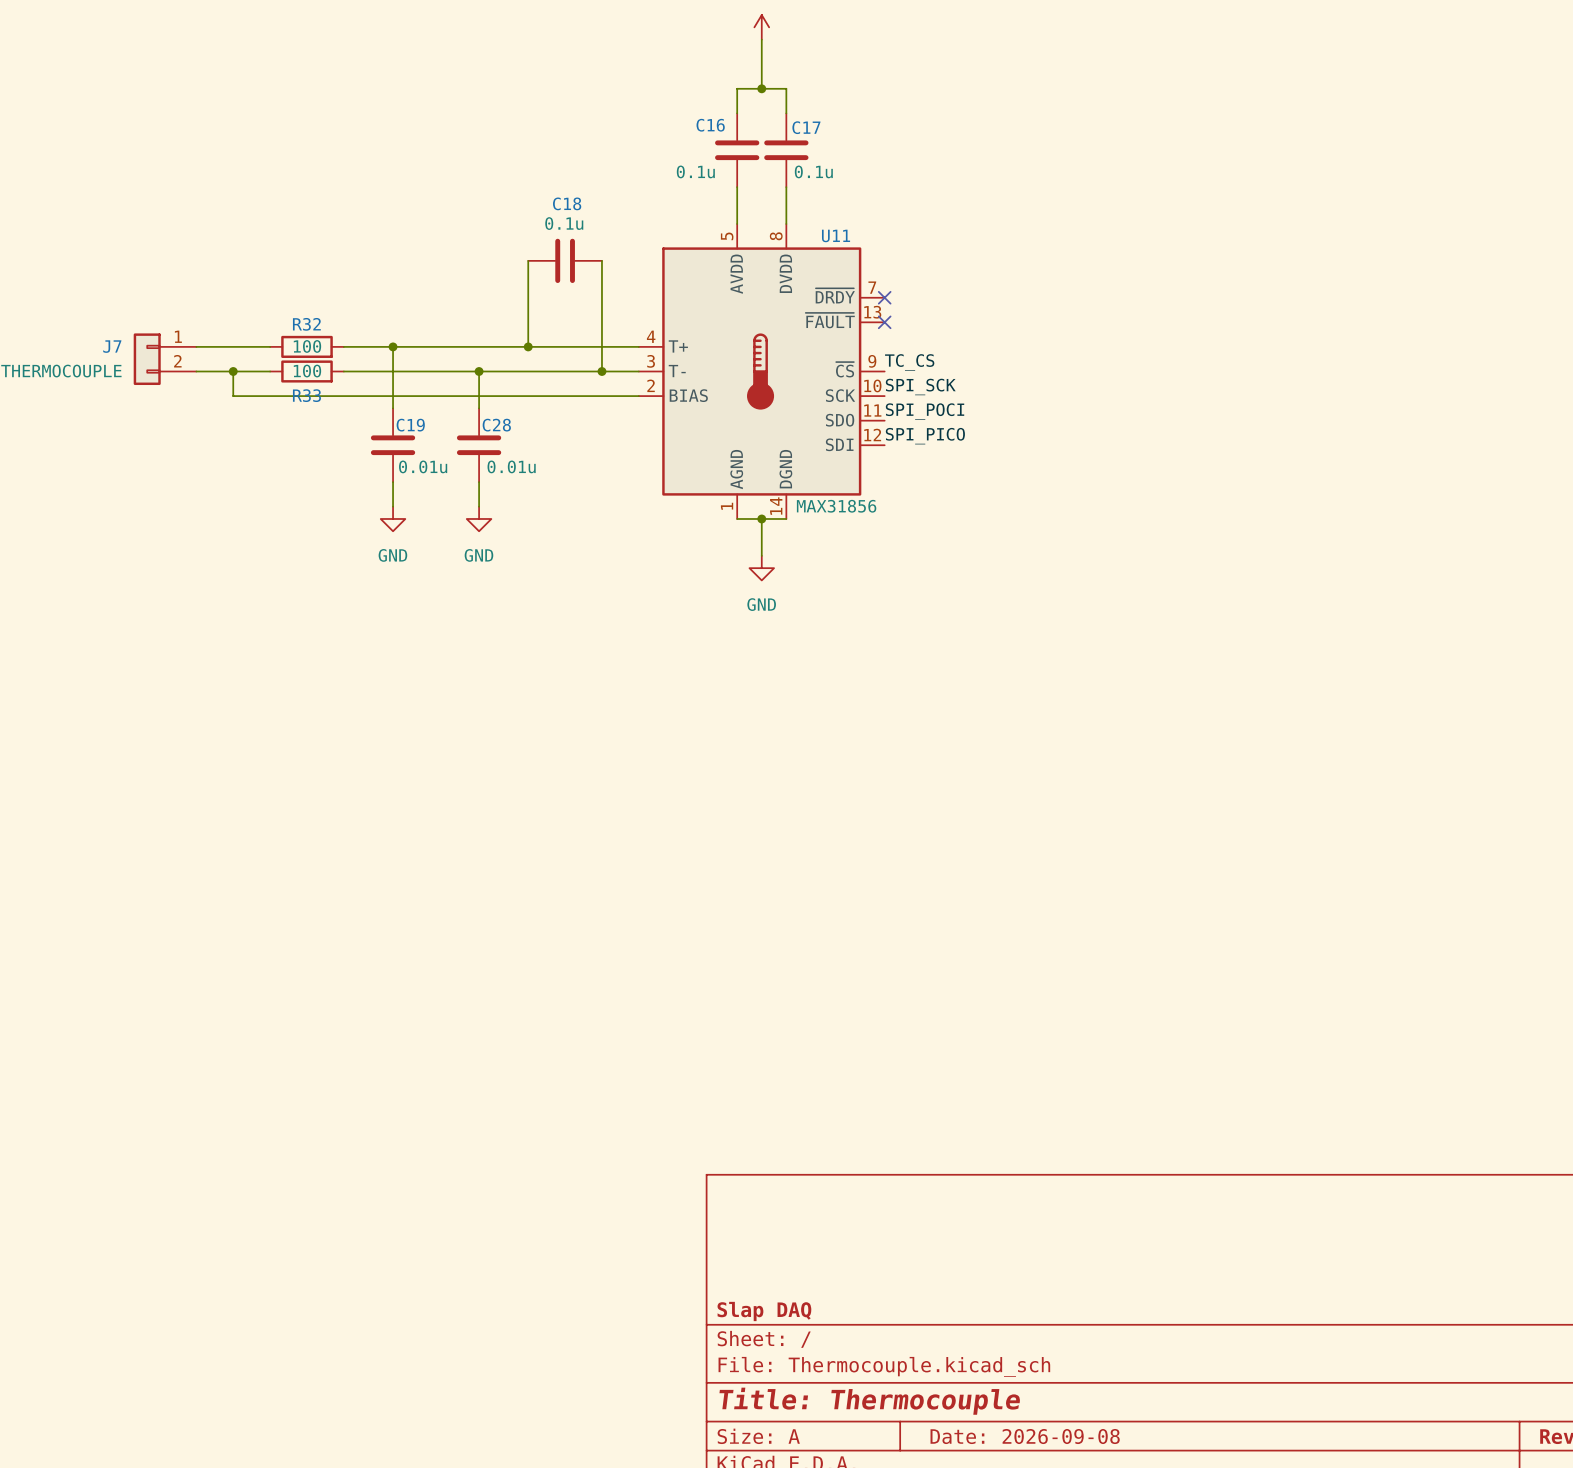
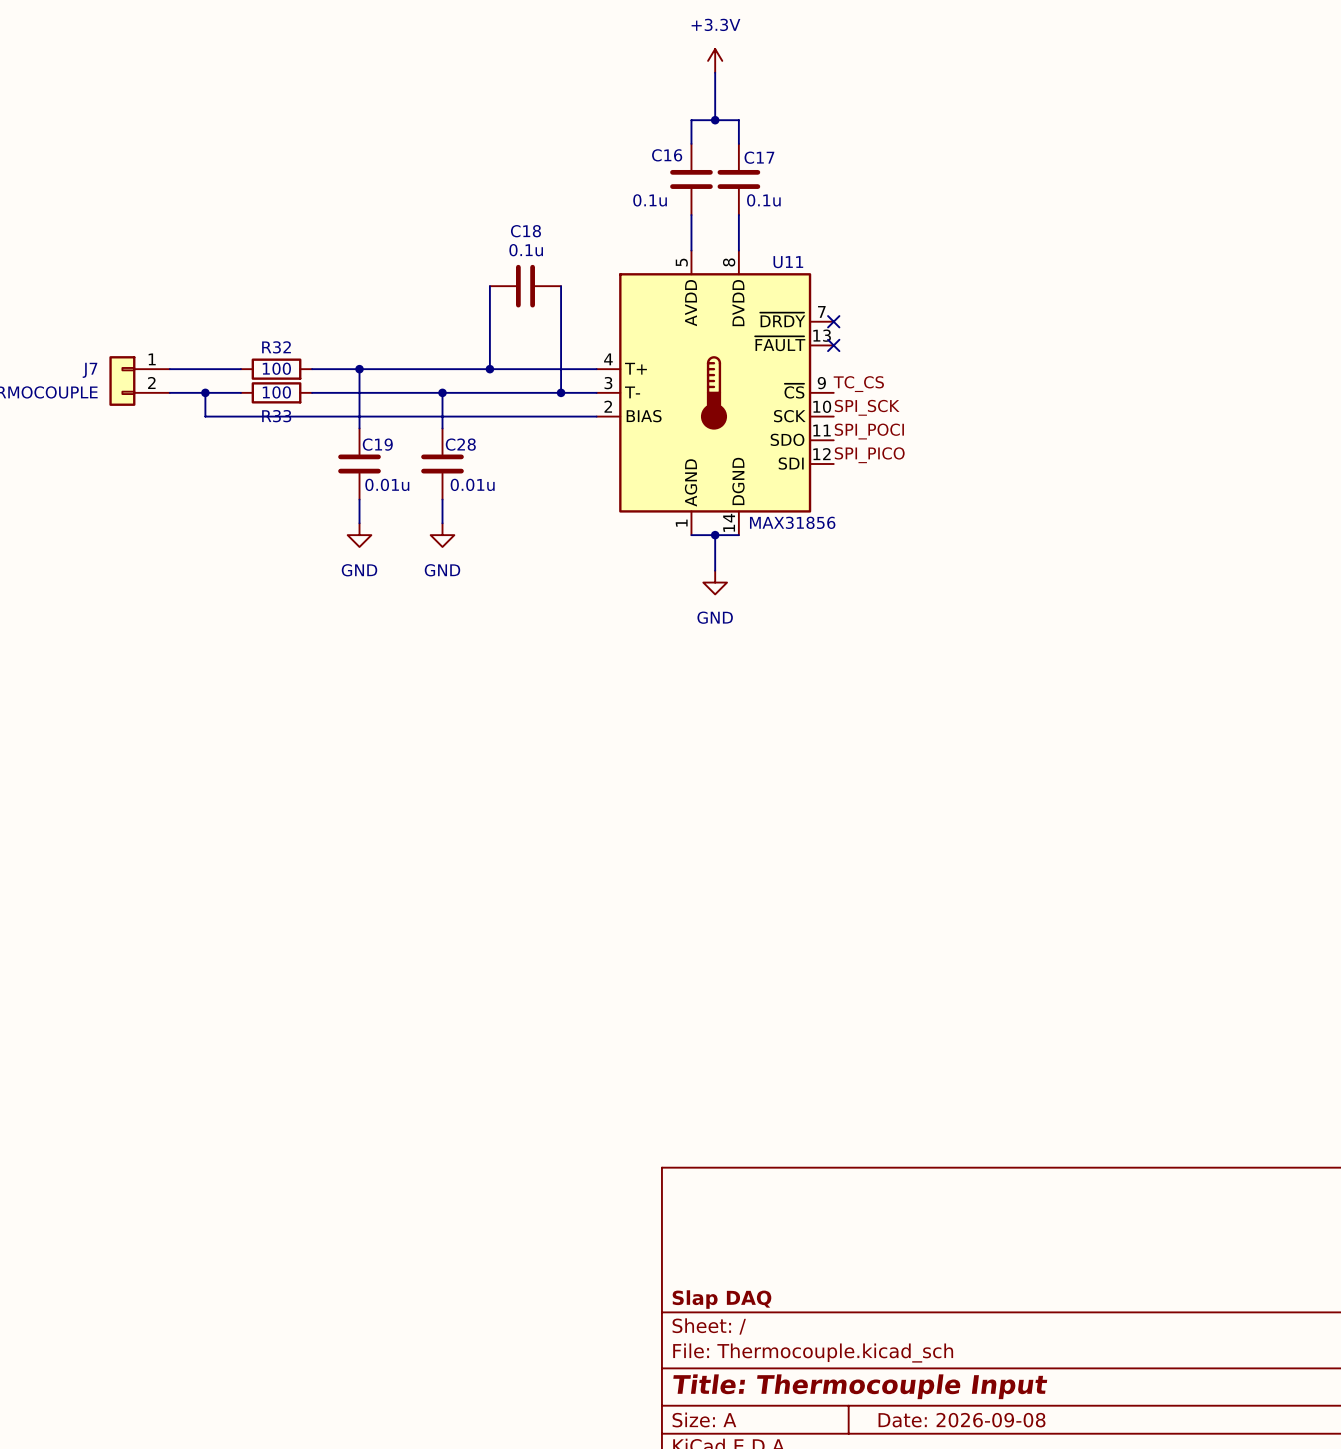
title block: Title: Thermocouple (869, 1401) -> Title: Thermocouple Input (860, 1386)

